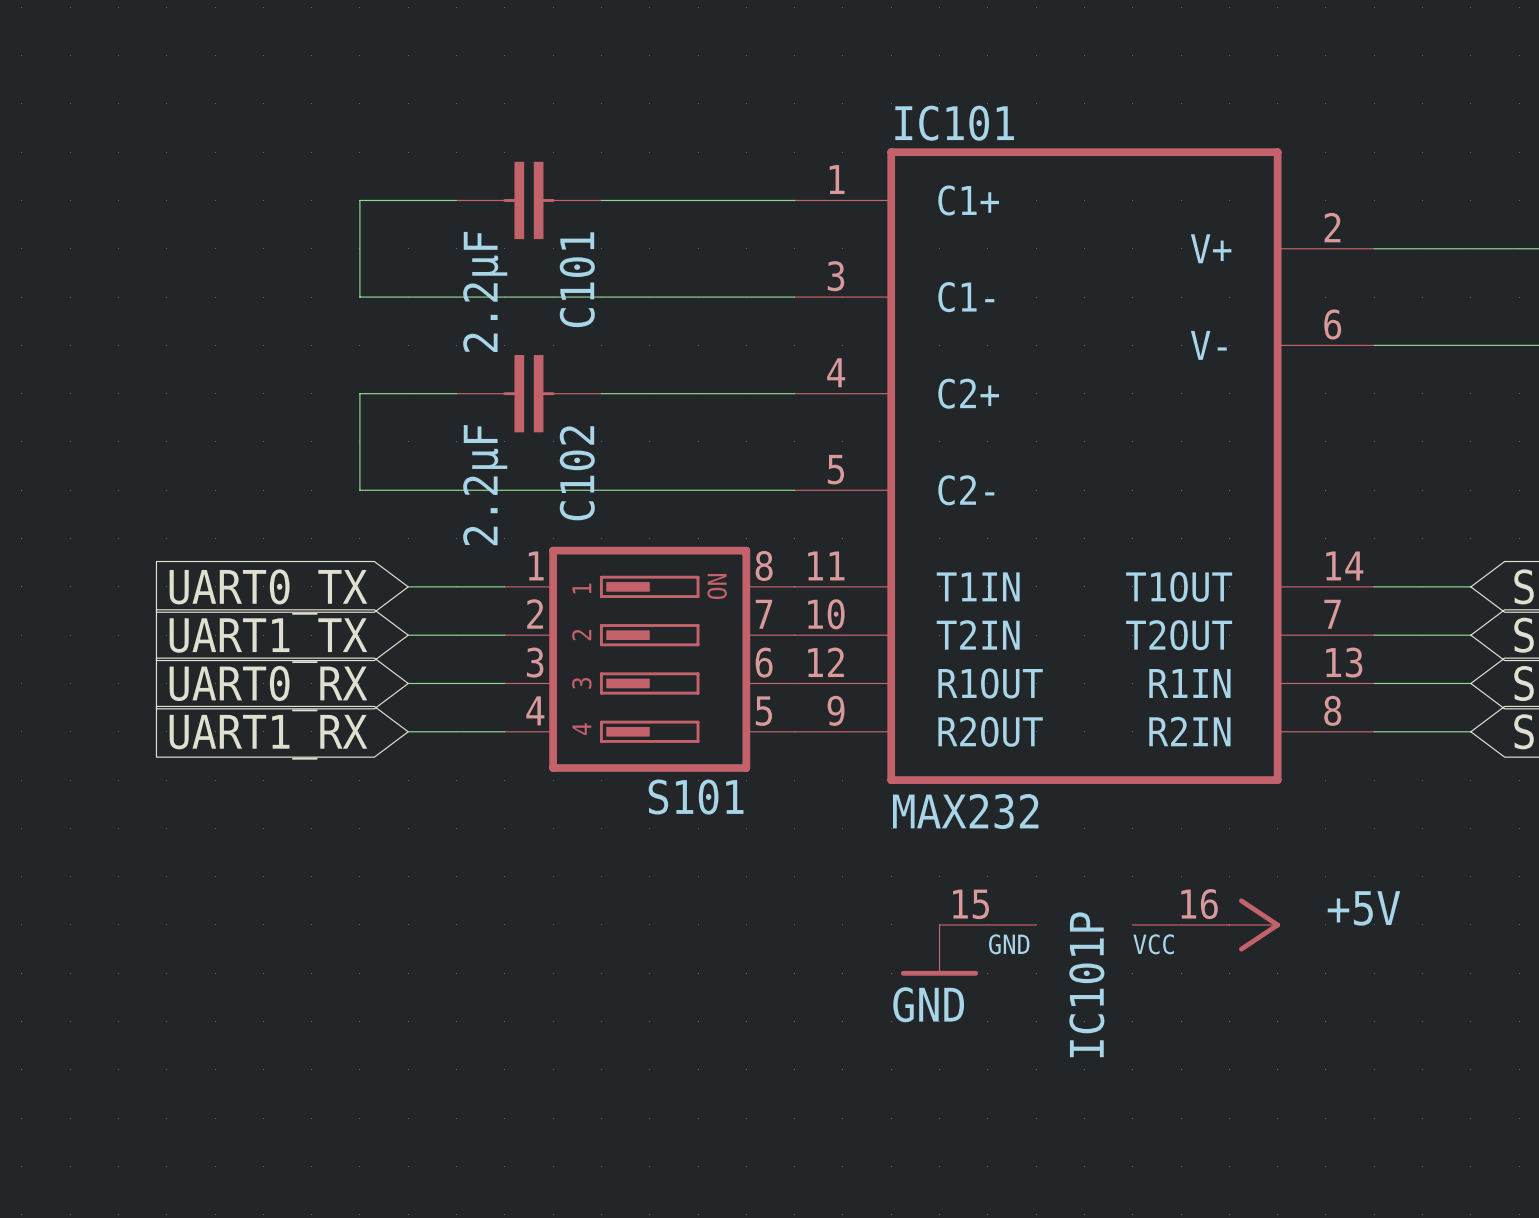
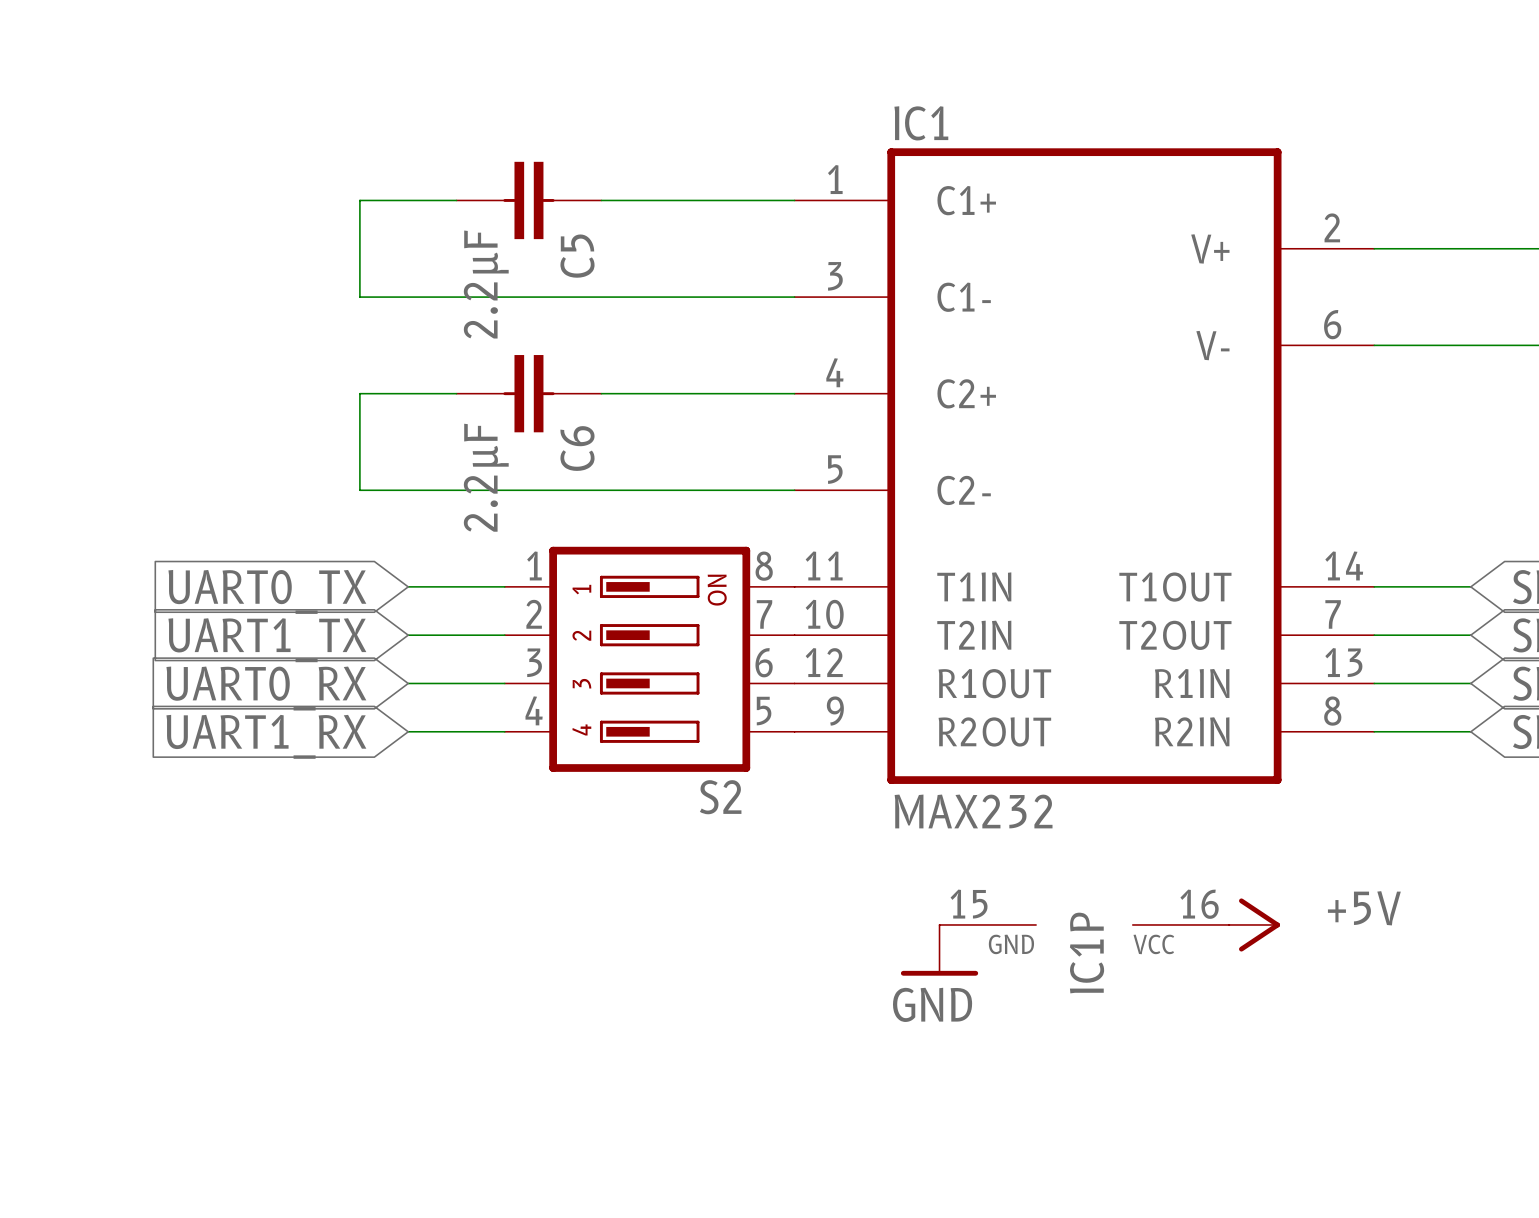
IC101 name: IC101 (954, 123) -> IC1 (921, 123)
C101 name: C101 (577, 279) -> C5 (577, 256)
C102 name: C102 (577, 473) -> C6 (577, 448)
S101 name: S101 (696, 797) -> S2 (720, 797)
IC101P name: IC101P (1086, 984) -> IC1P (1087, 953)

